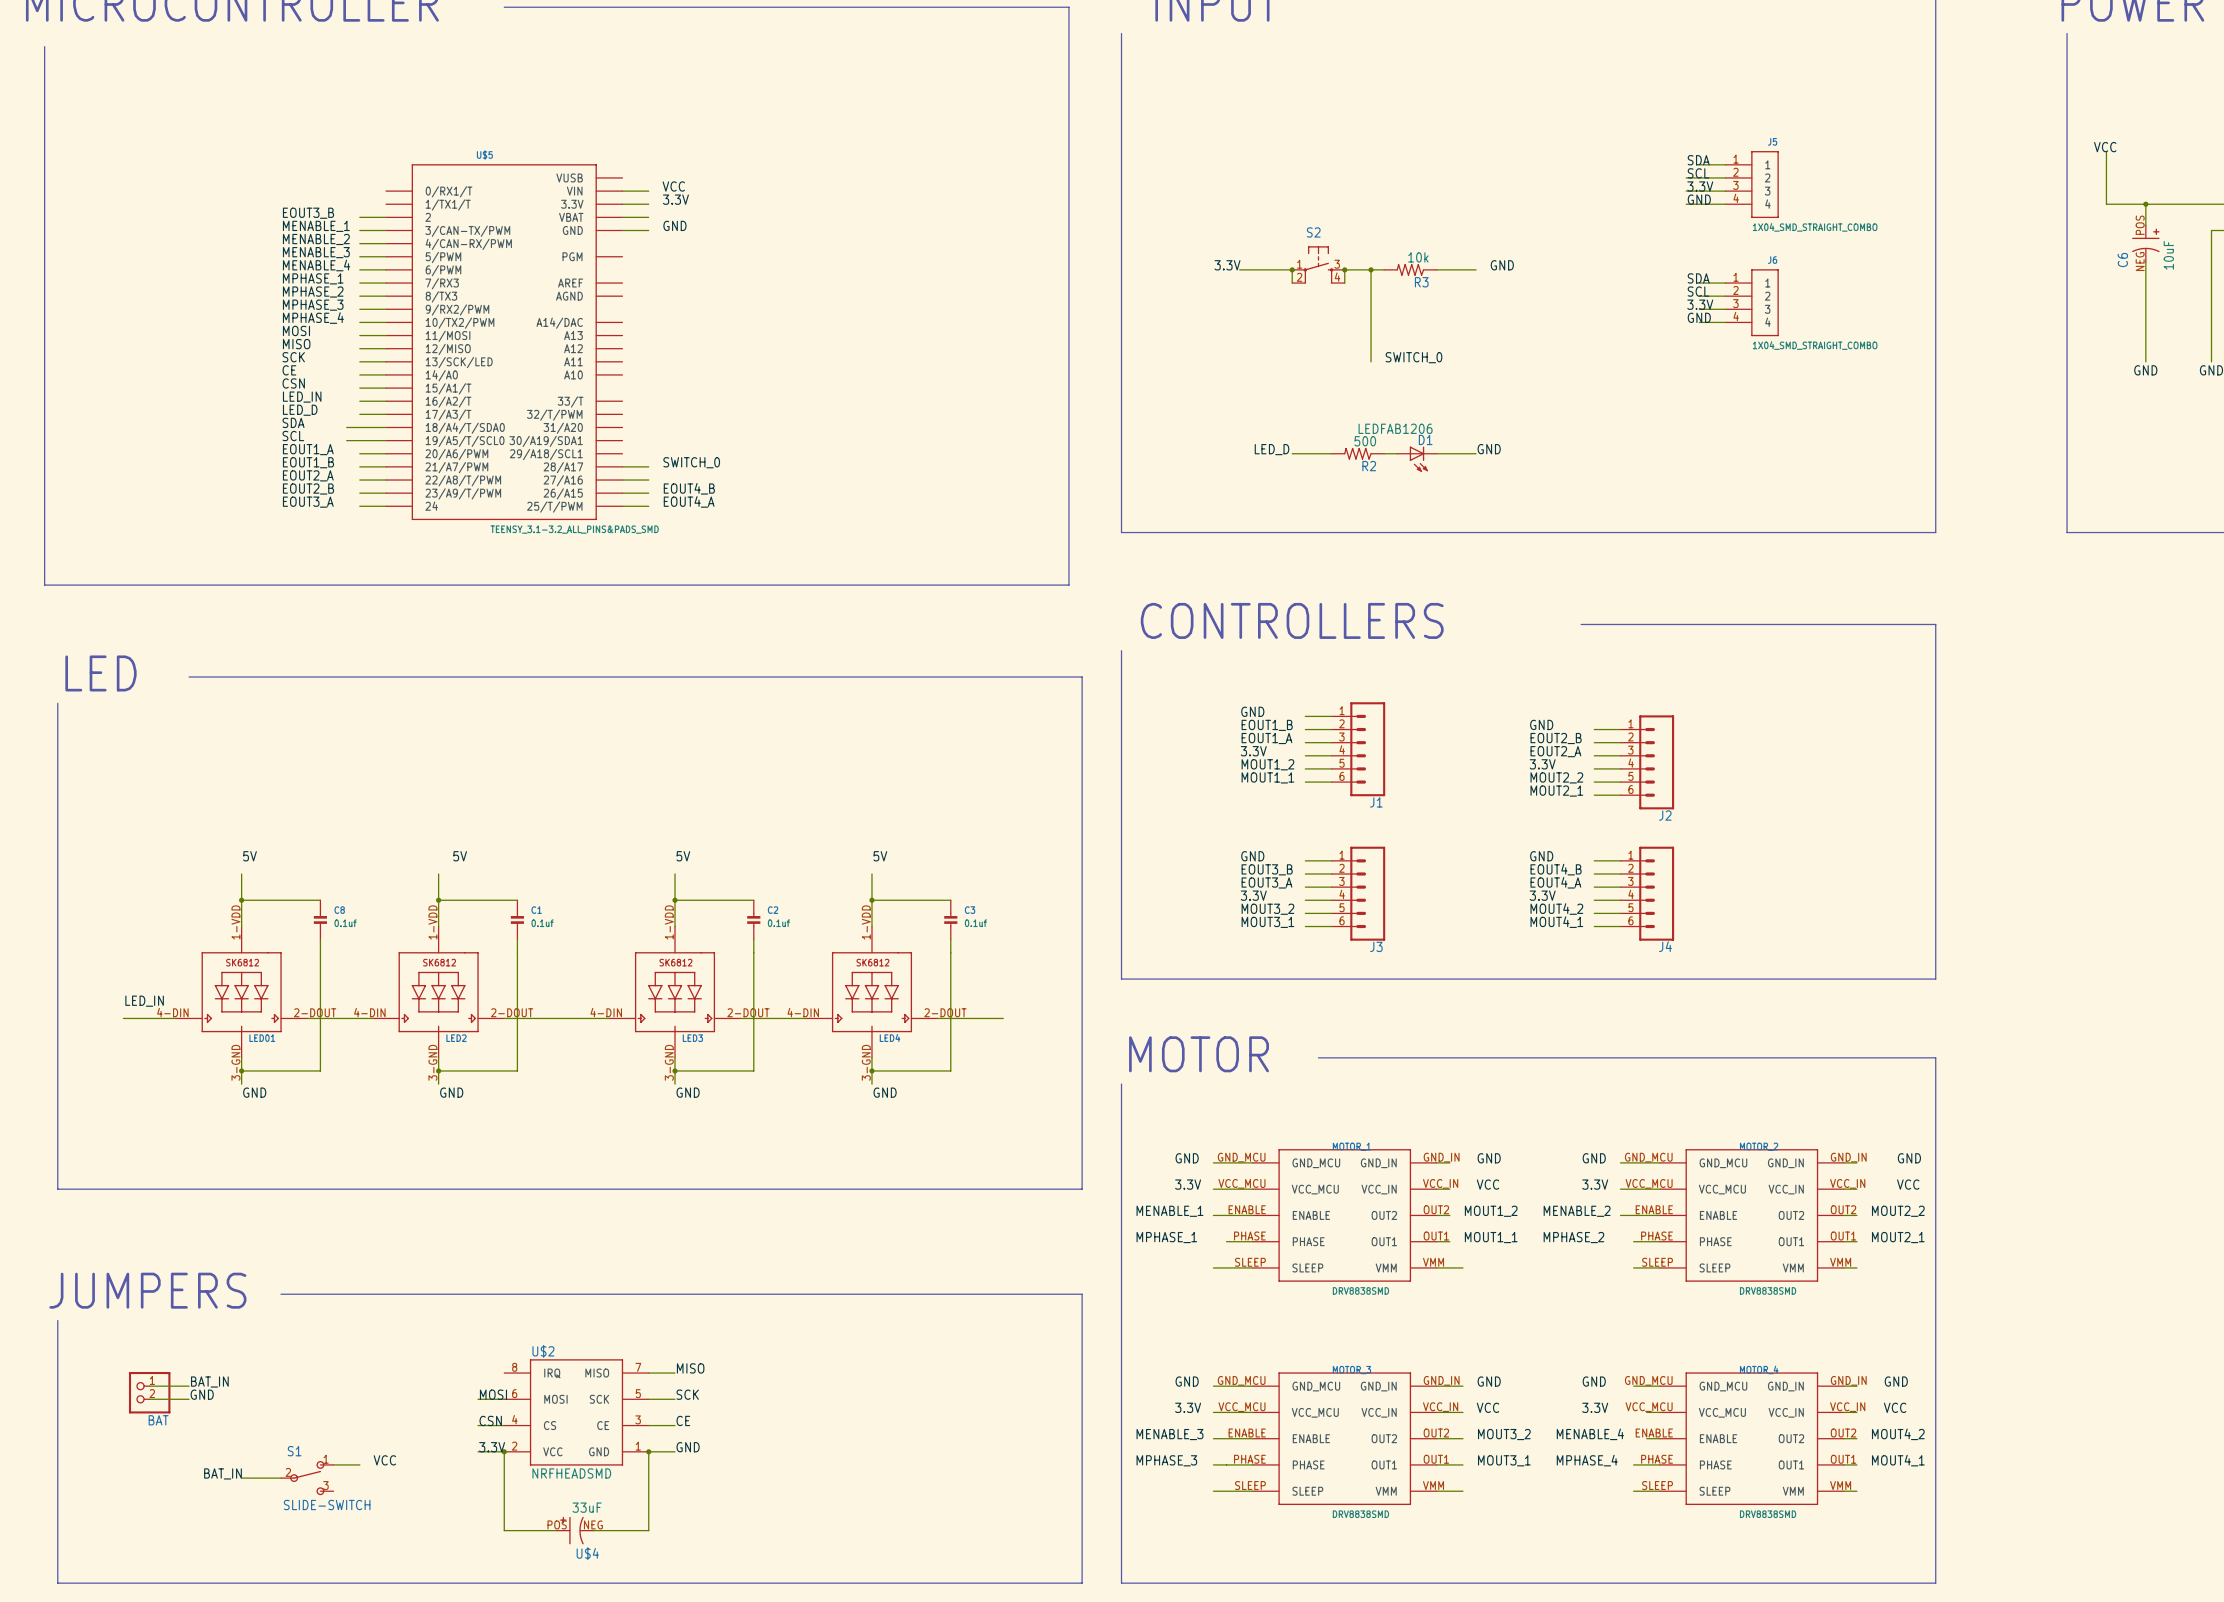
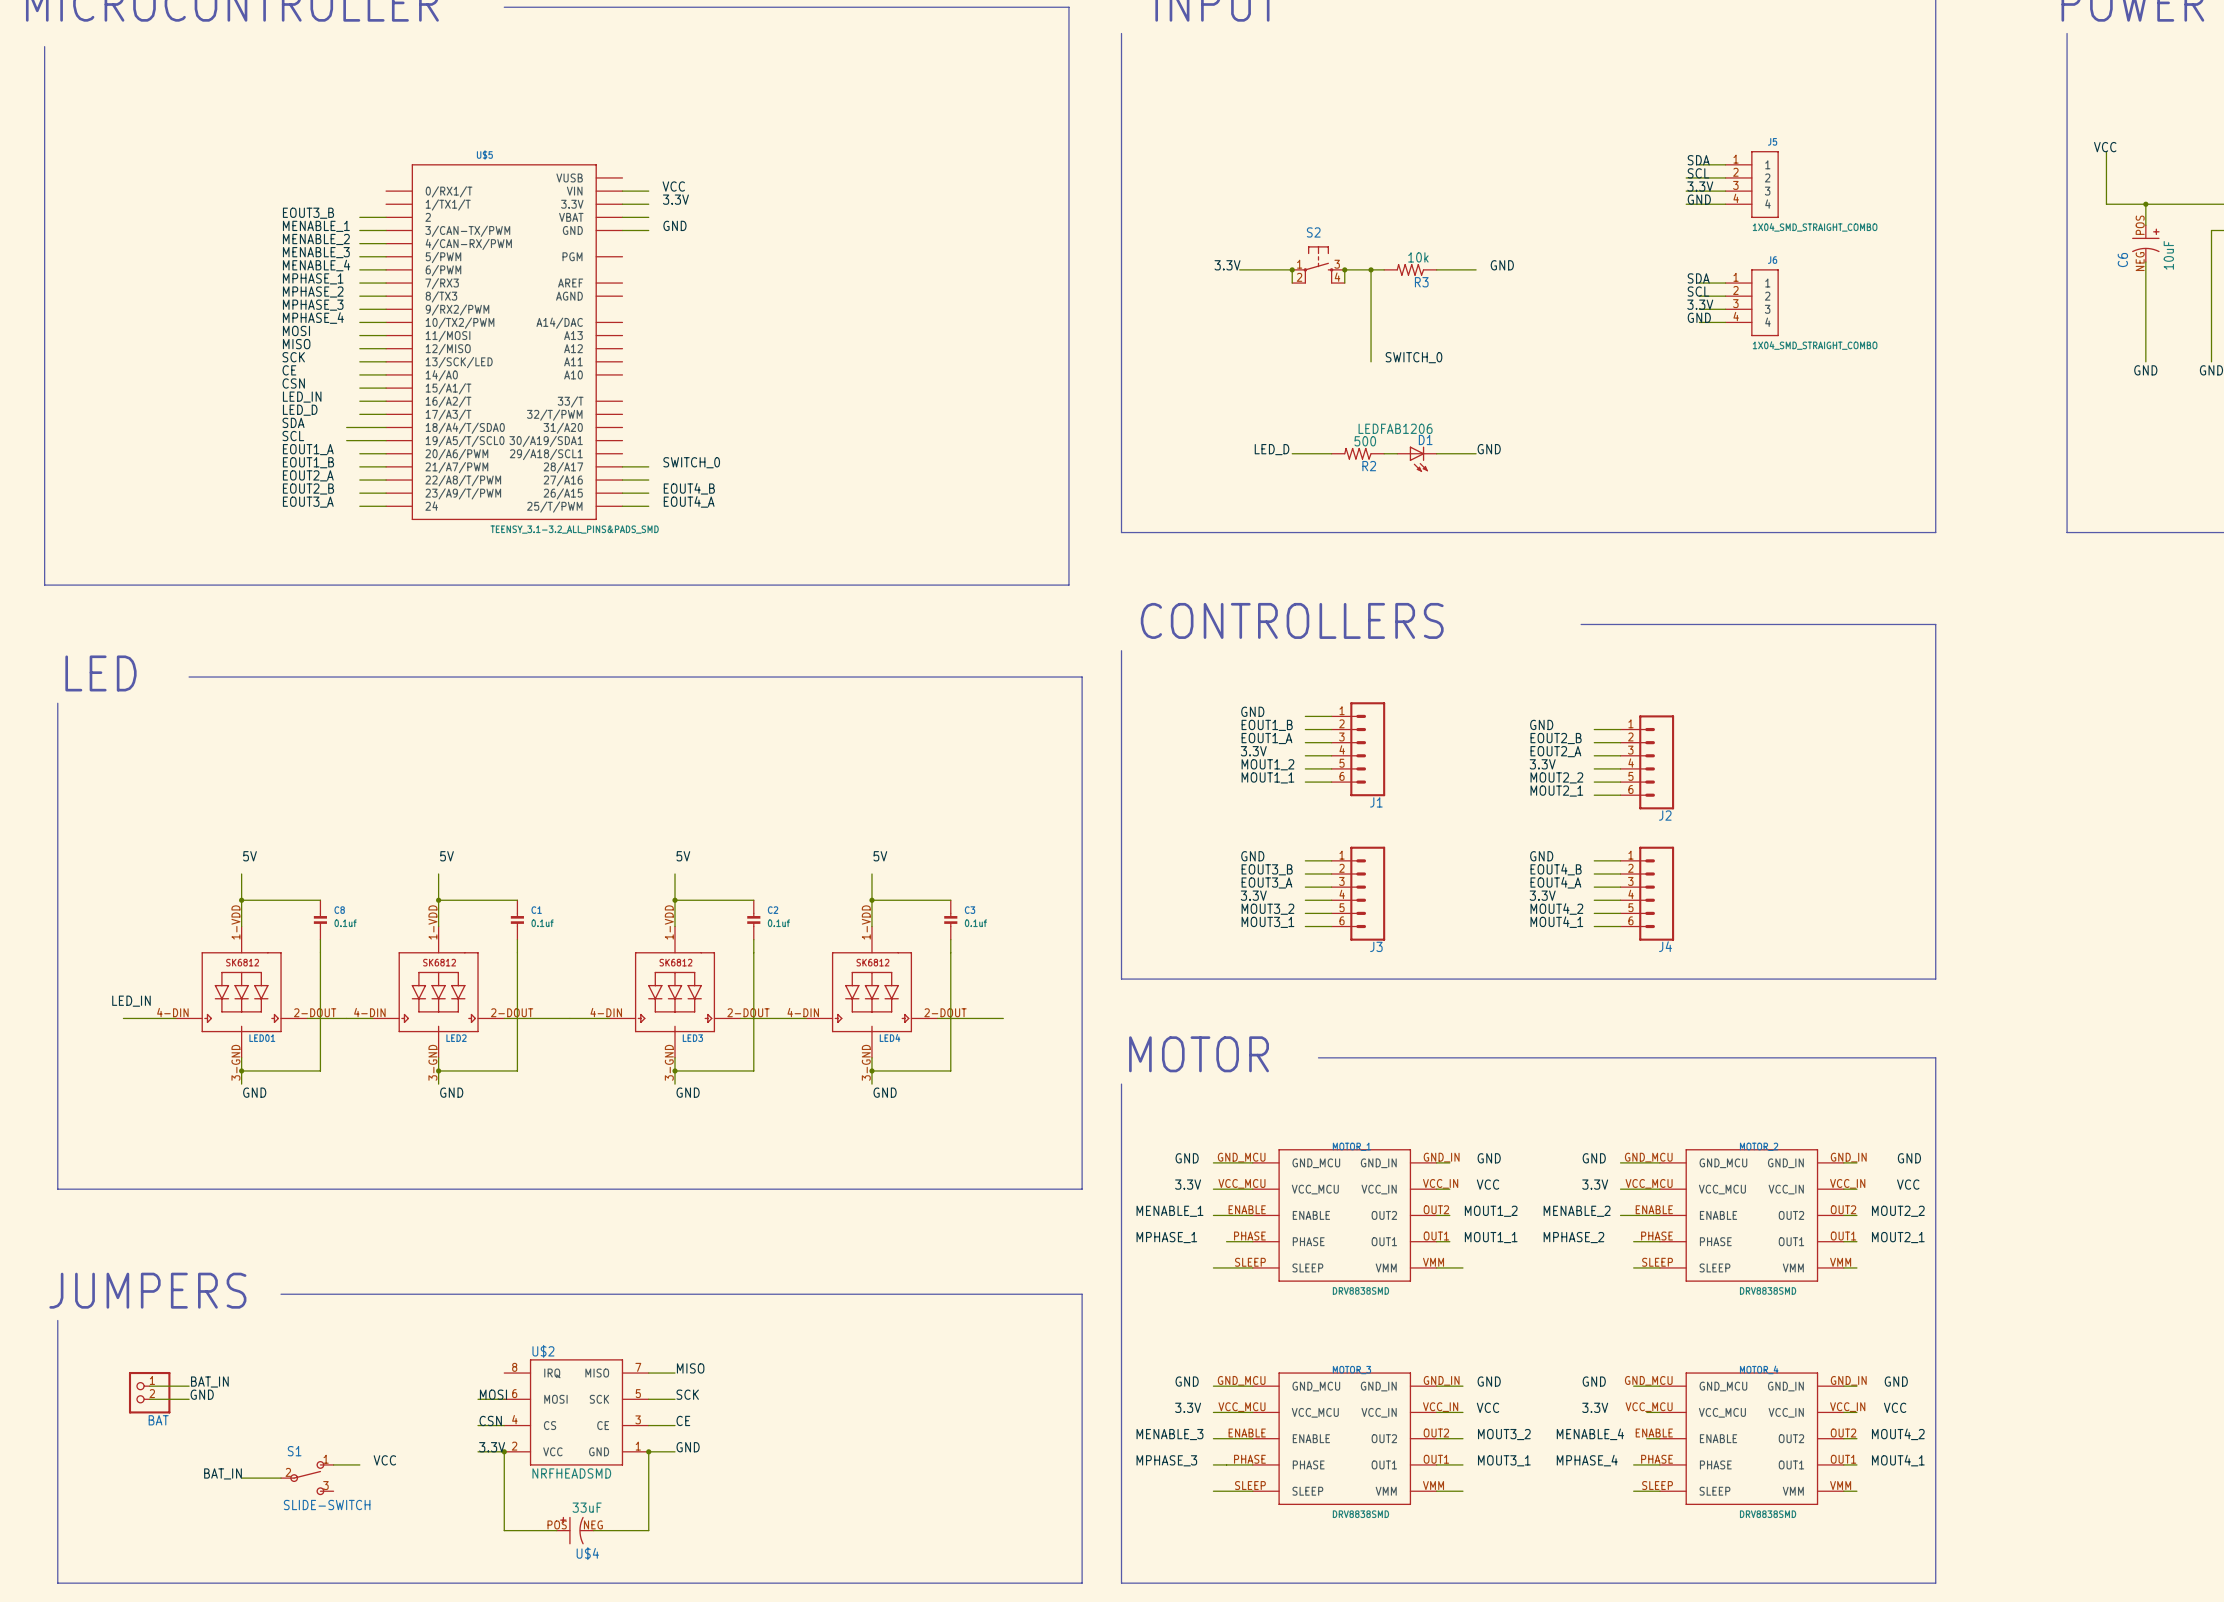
label position: 5V (460, 856) -> 5V (446, 856)
label position: LED_IN (144, 1001) -> LED_IN (131, 1001)

